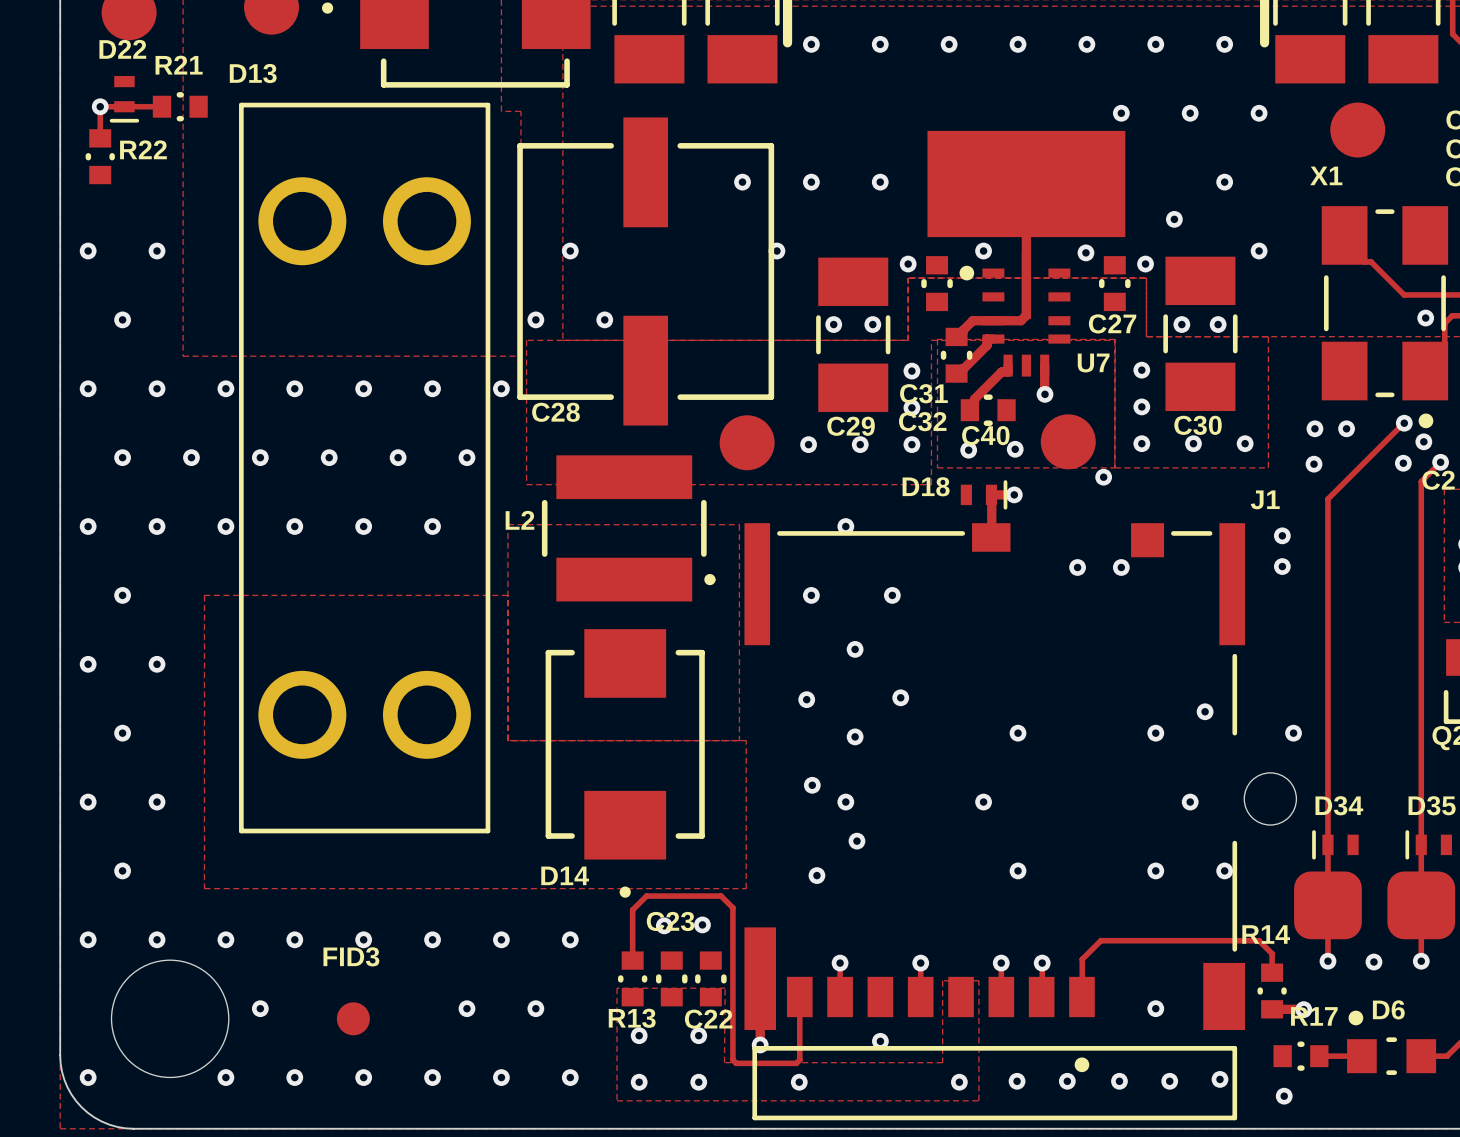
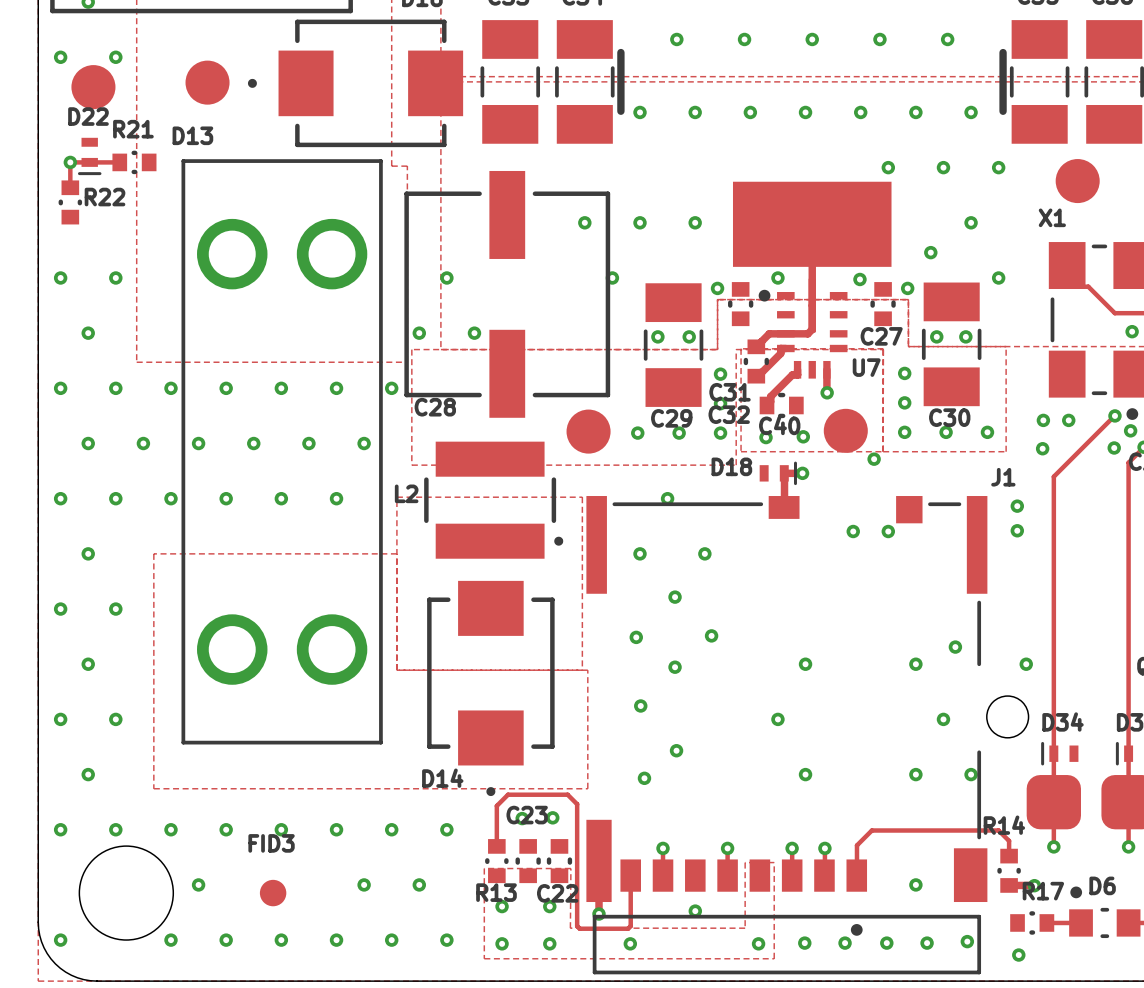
via: (845, 802) -> none
via: (1373, 962) -> none

